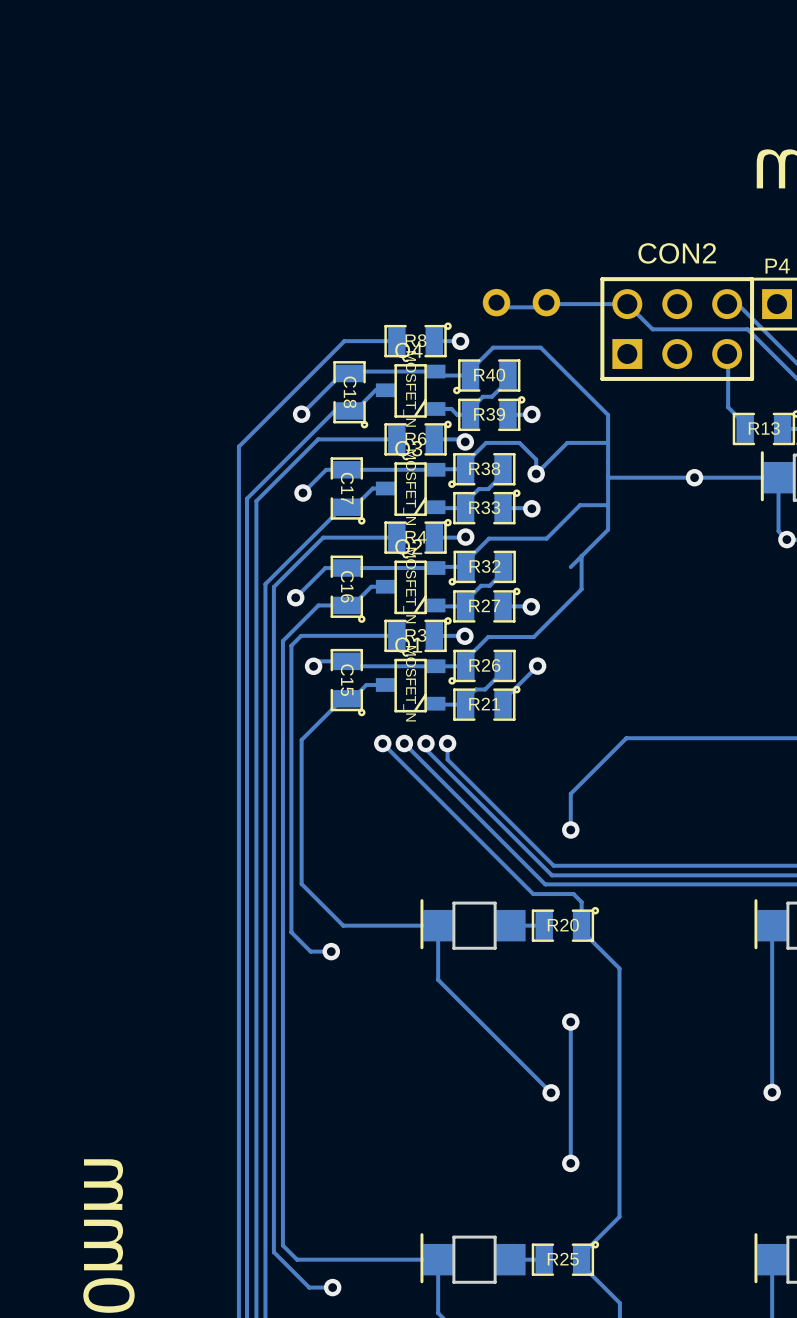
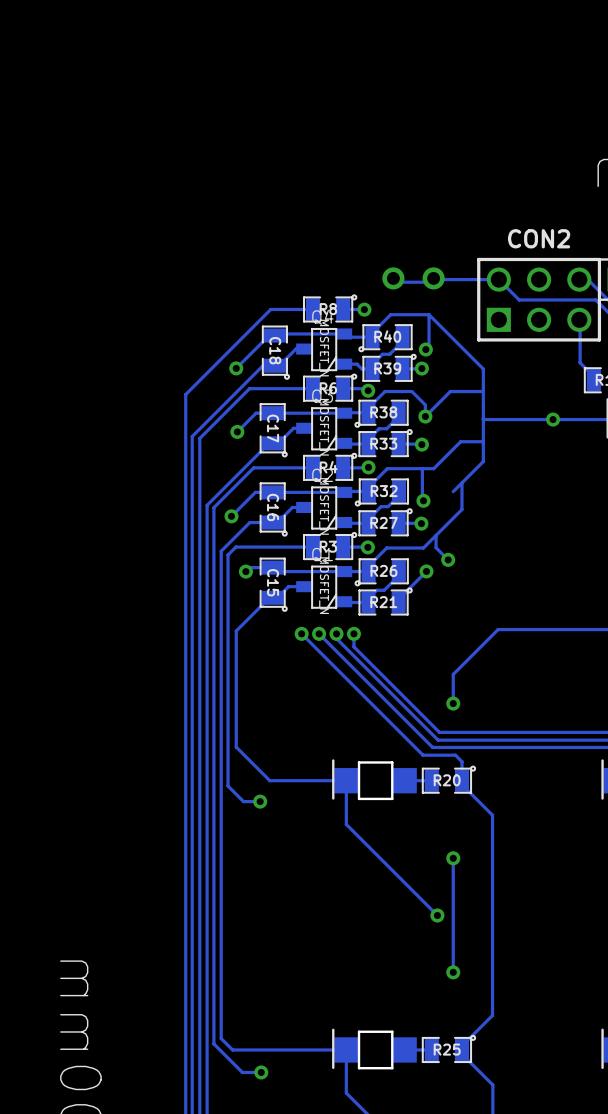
track: none -> (429, 314) (429, 346) (425, 349)
via: none -> (425, 349)
track: none -> (422, 468) (423, 500)
via: none -> (423, 500)
track: none -> (436, 535) (436, 547) (448, 559)
via: none -> (448, 559)

